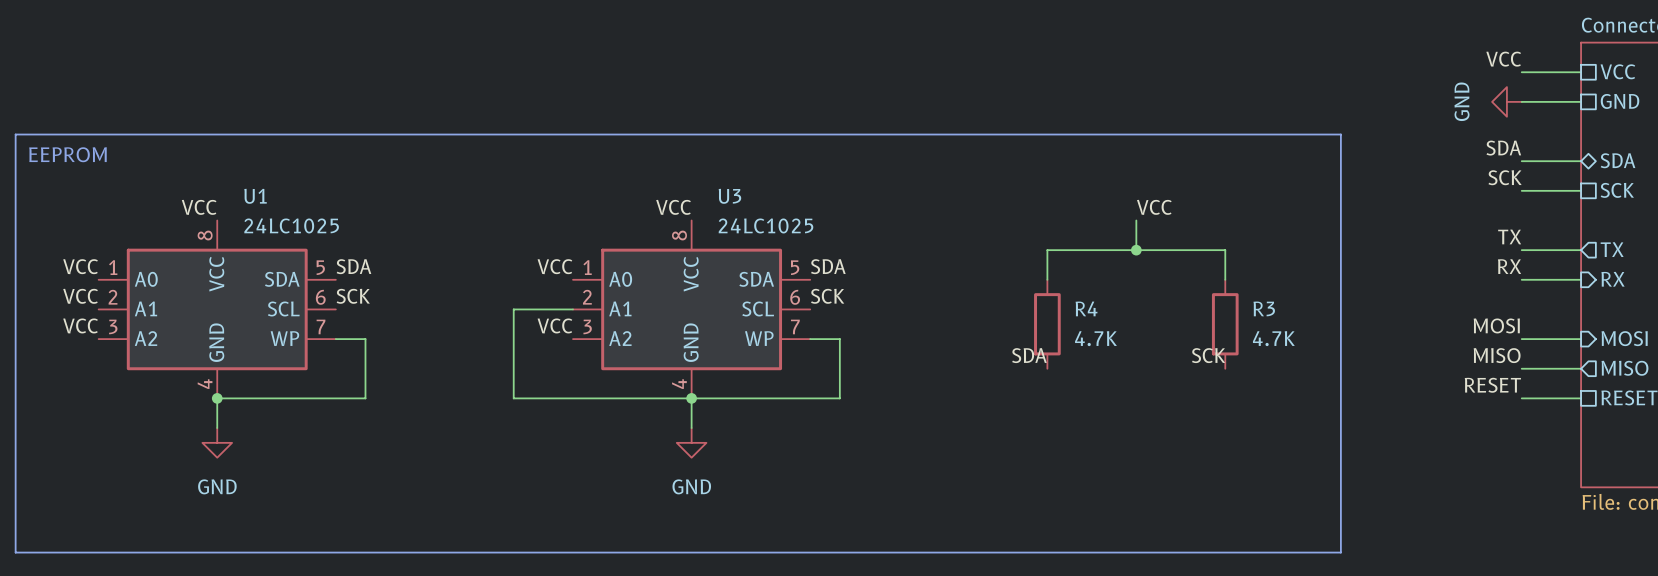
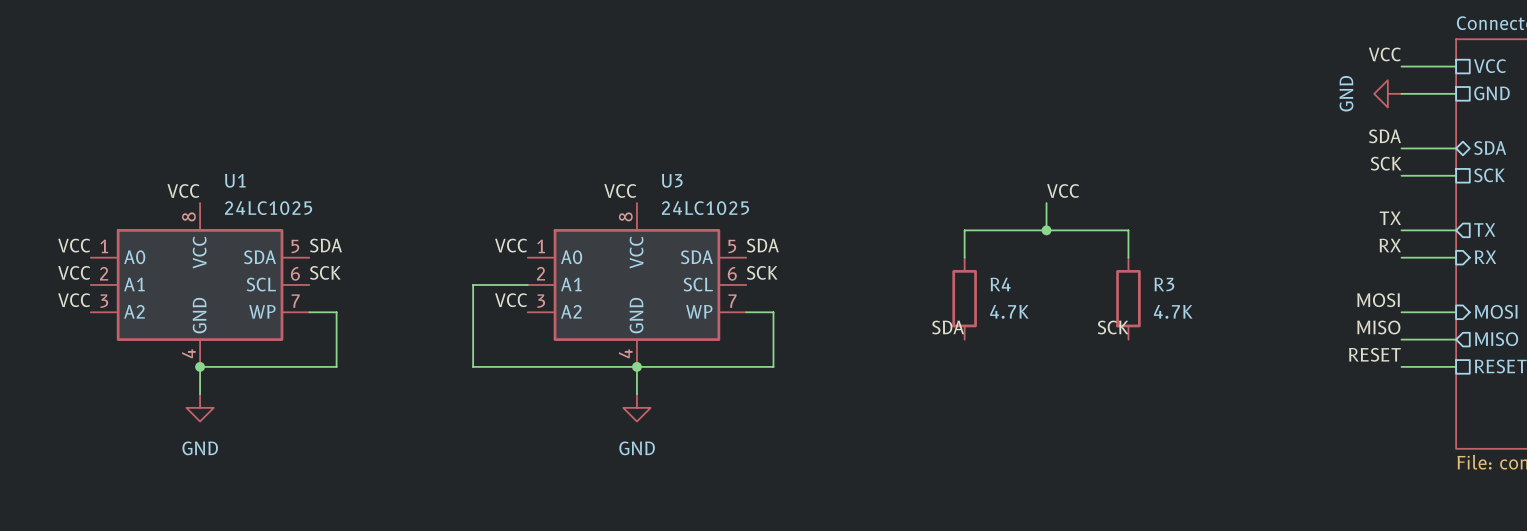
line: (15, 134) (1340, 134) (1340, 552) (15, 552) (15, 134) -> none
text: EEPROM (67, 154) -> none

